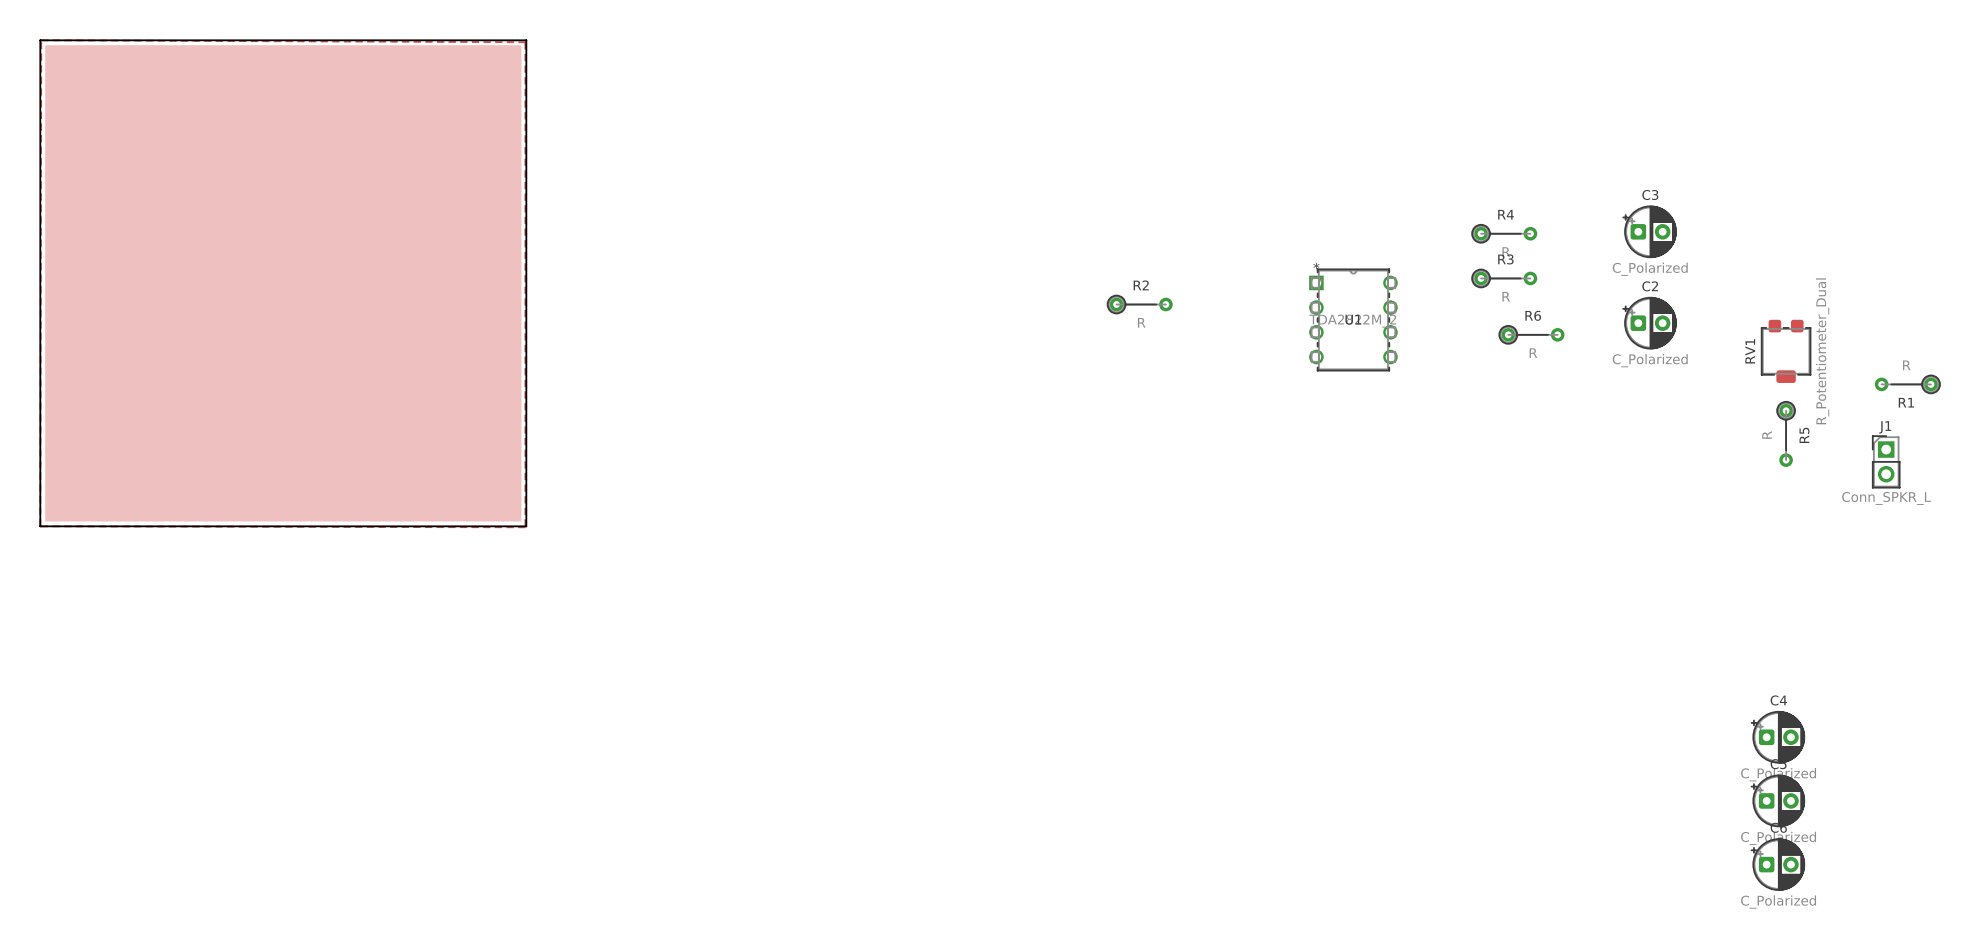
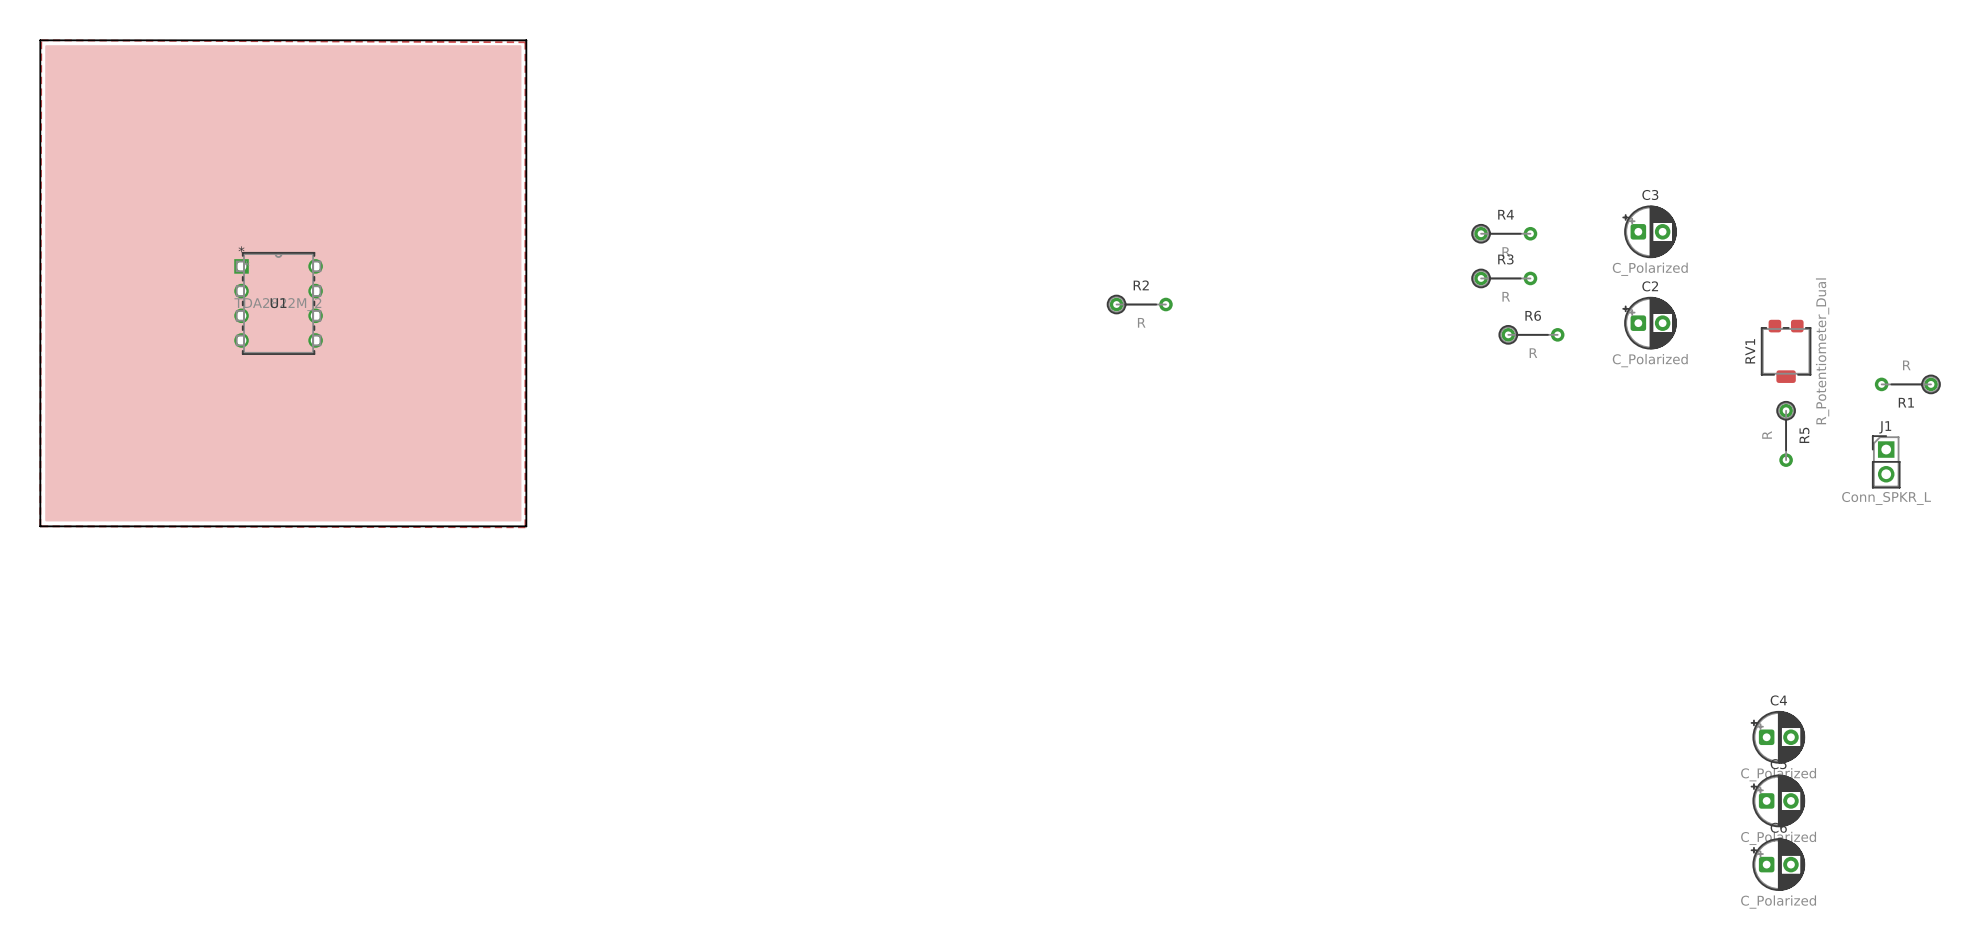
U1 position: (1353, 319) -> (278, 303)

